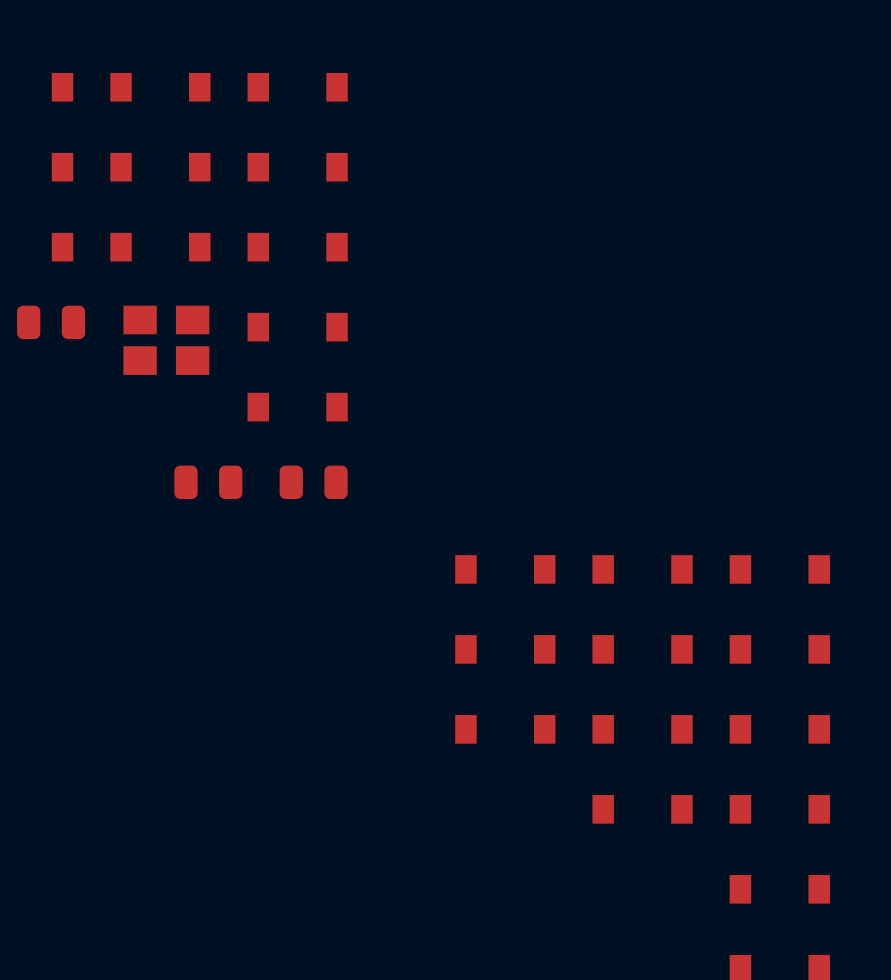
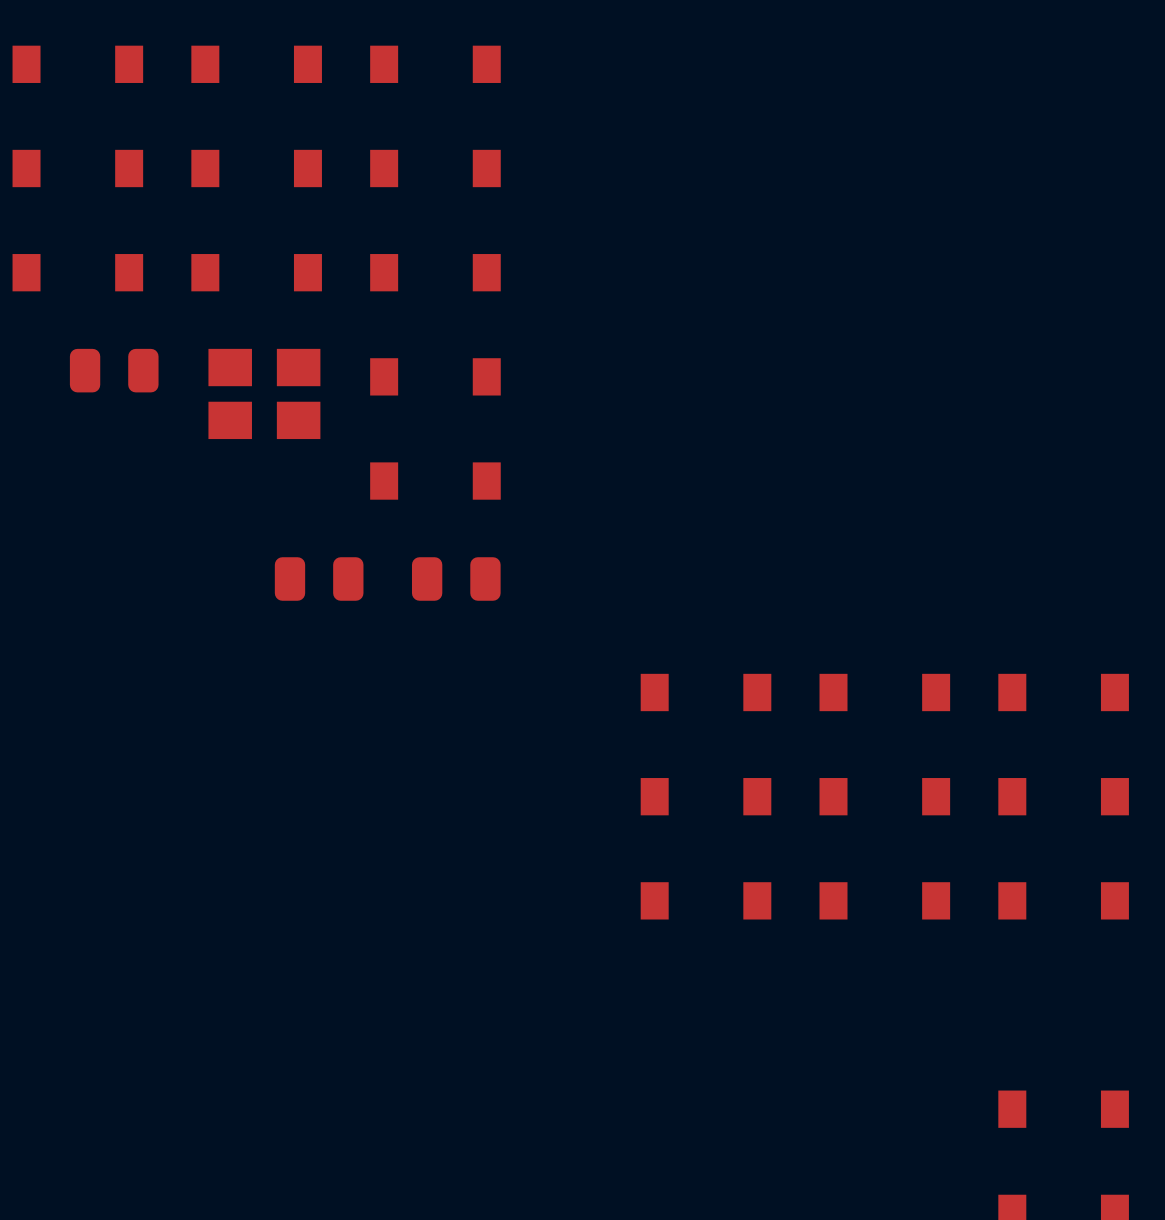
part: (642, 809) -> none
part: (779, 809) -> none

